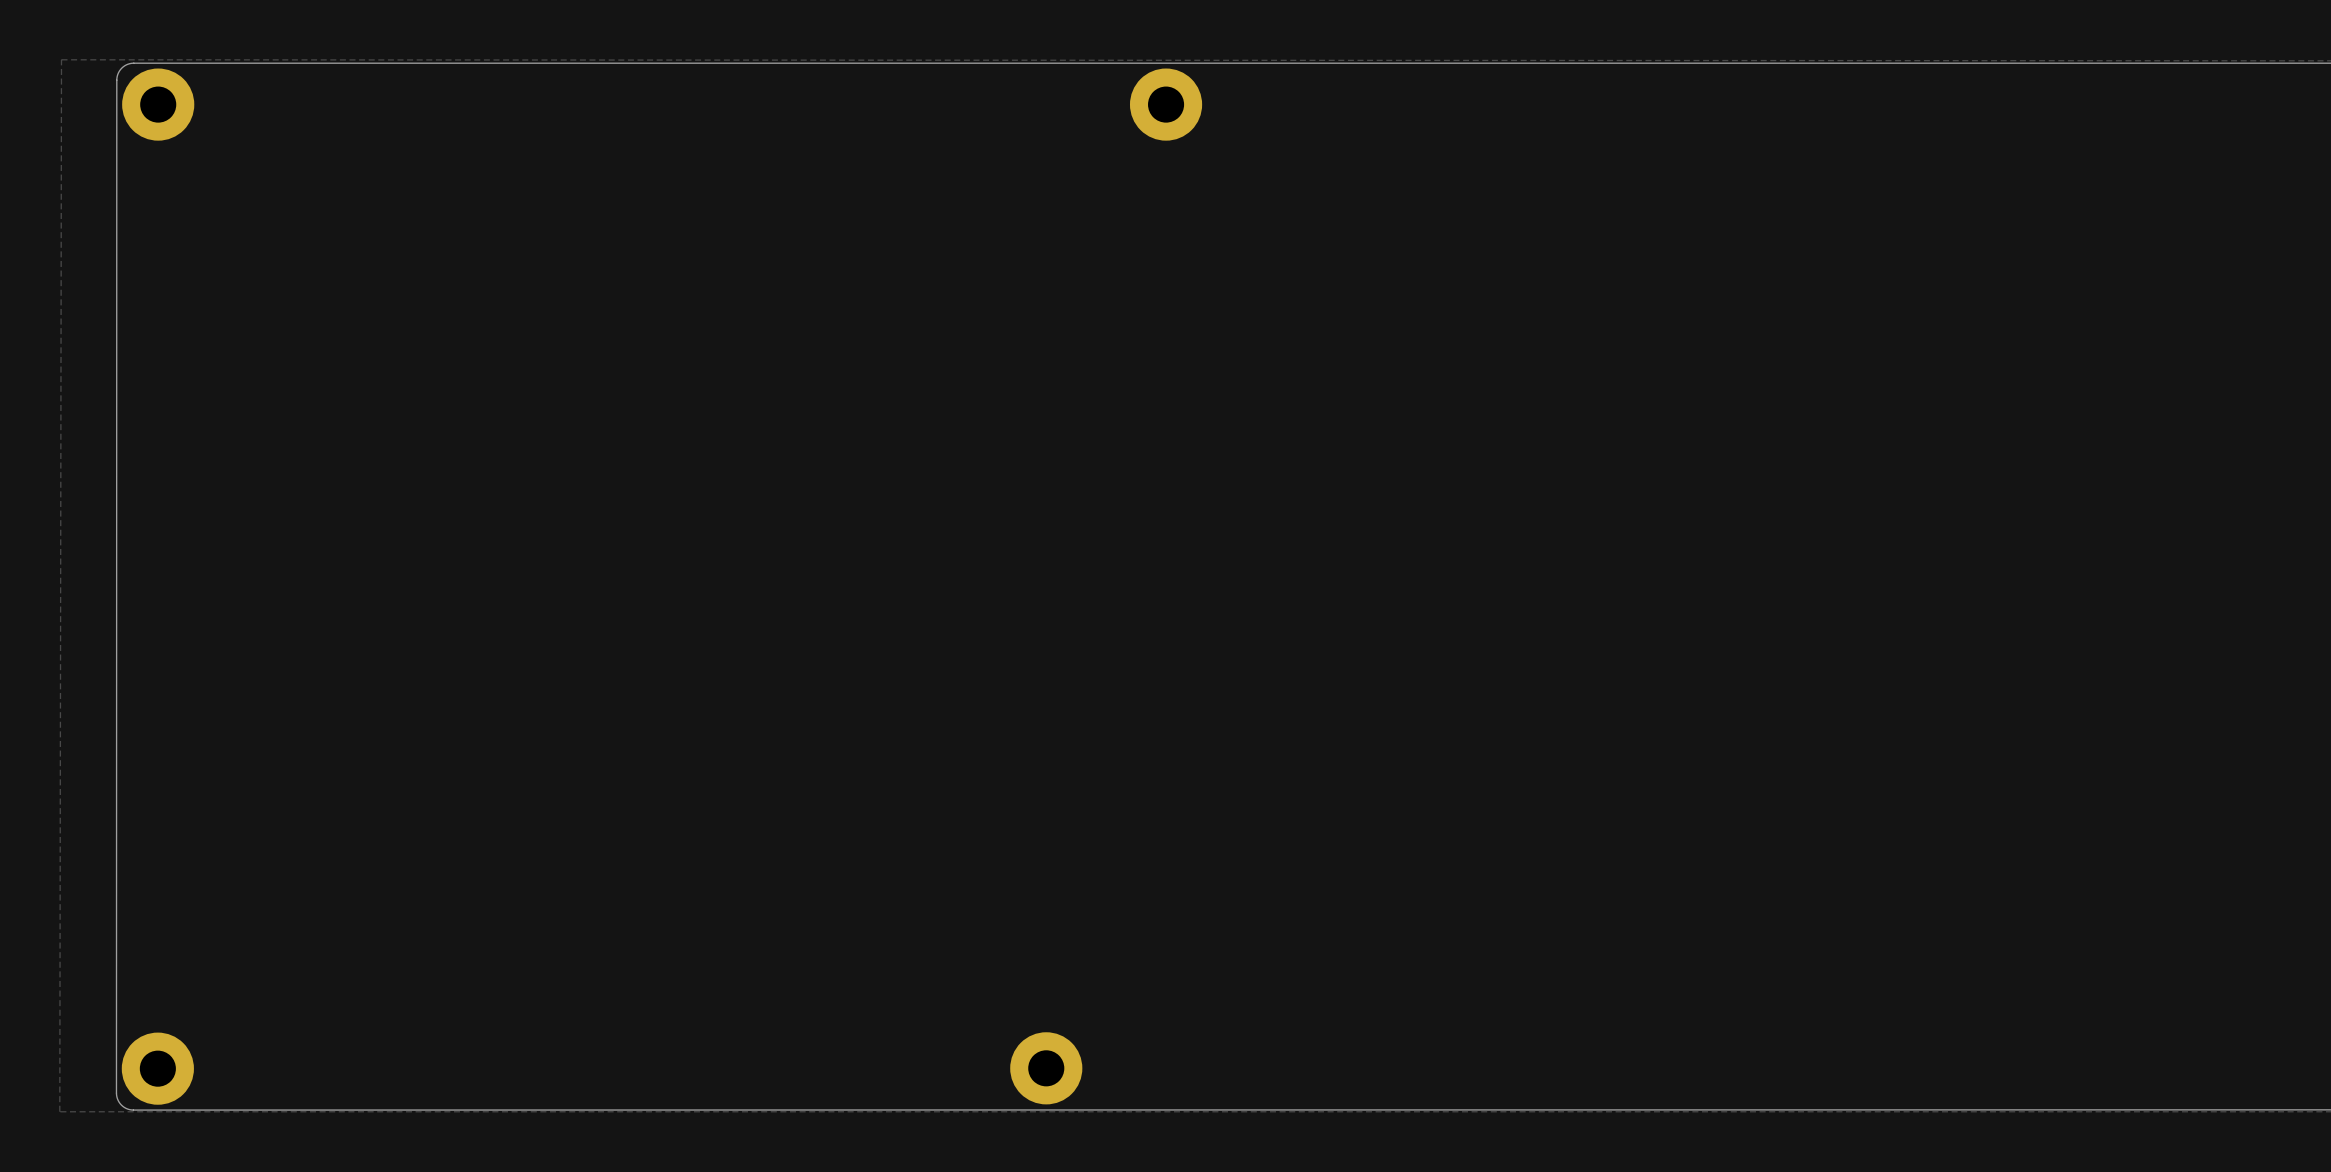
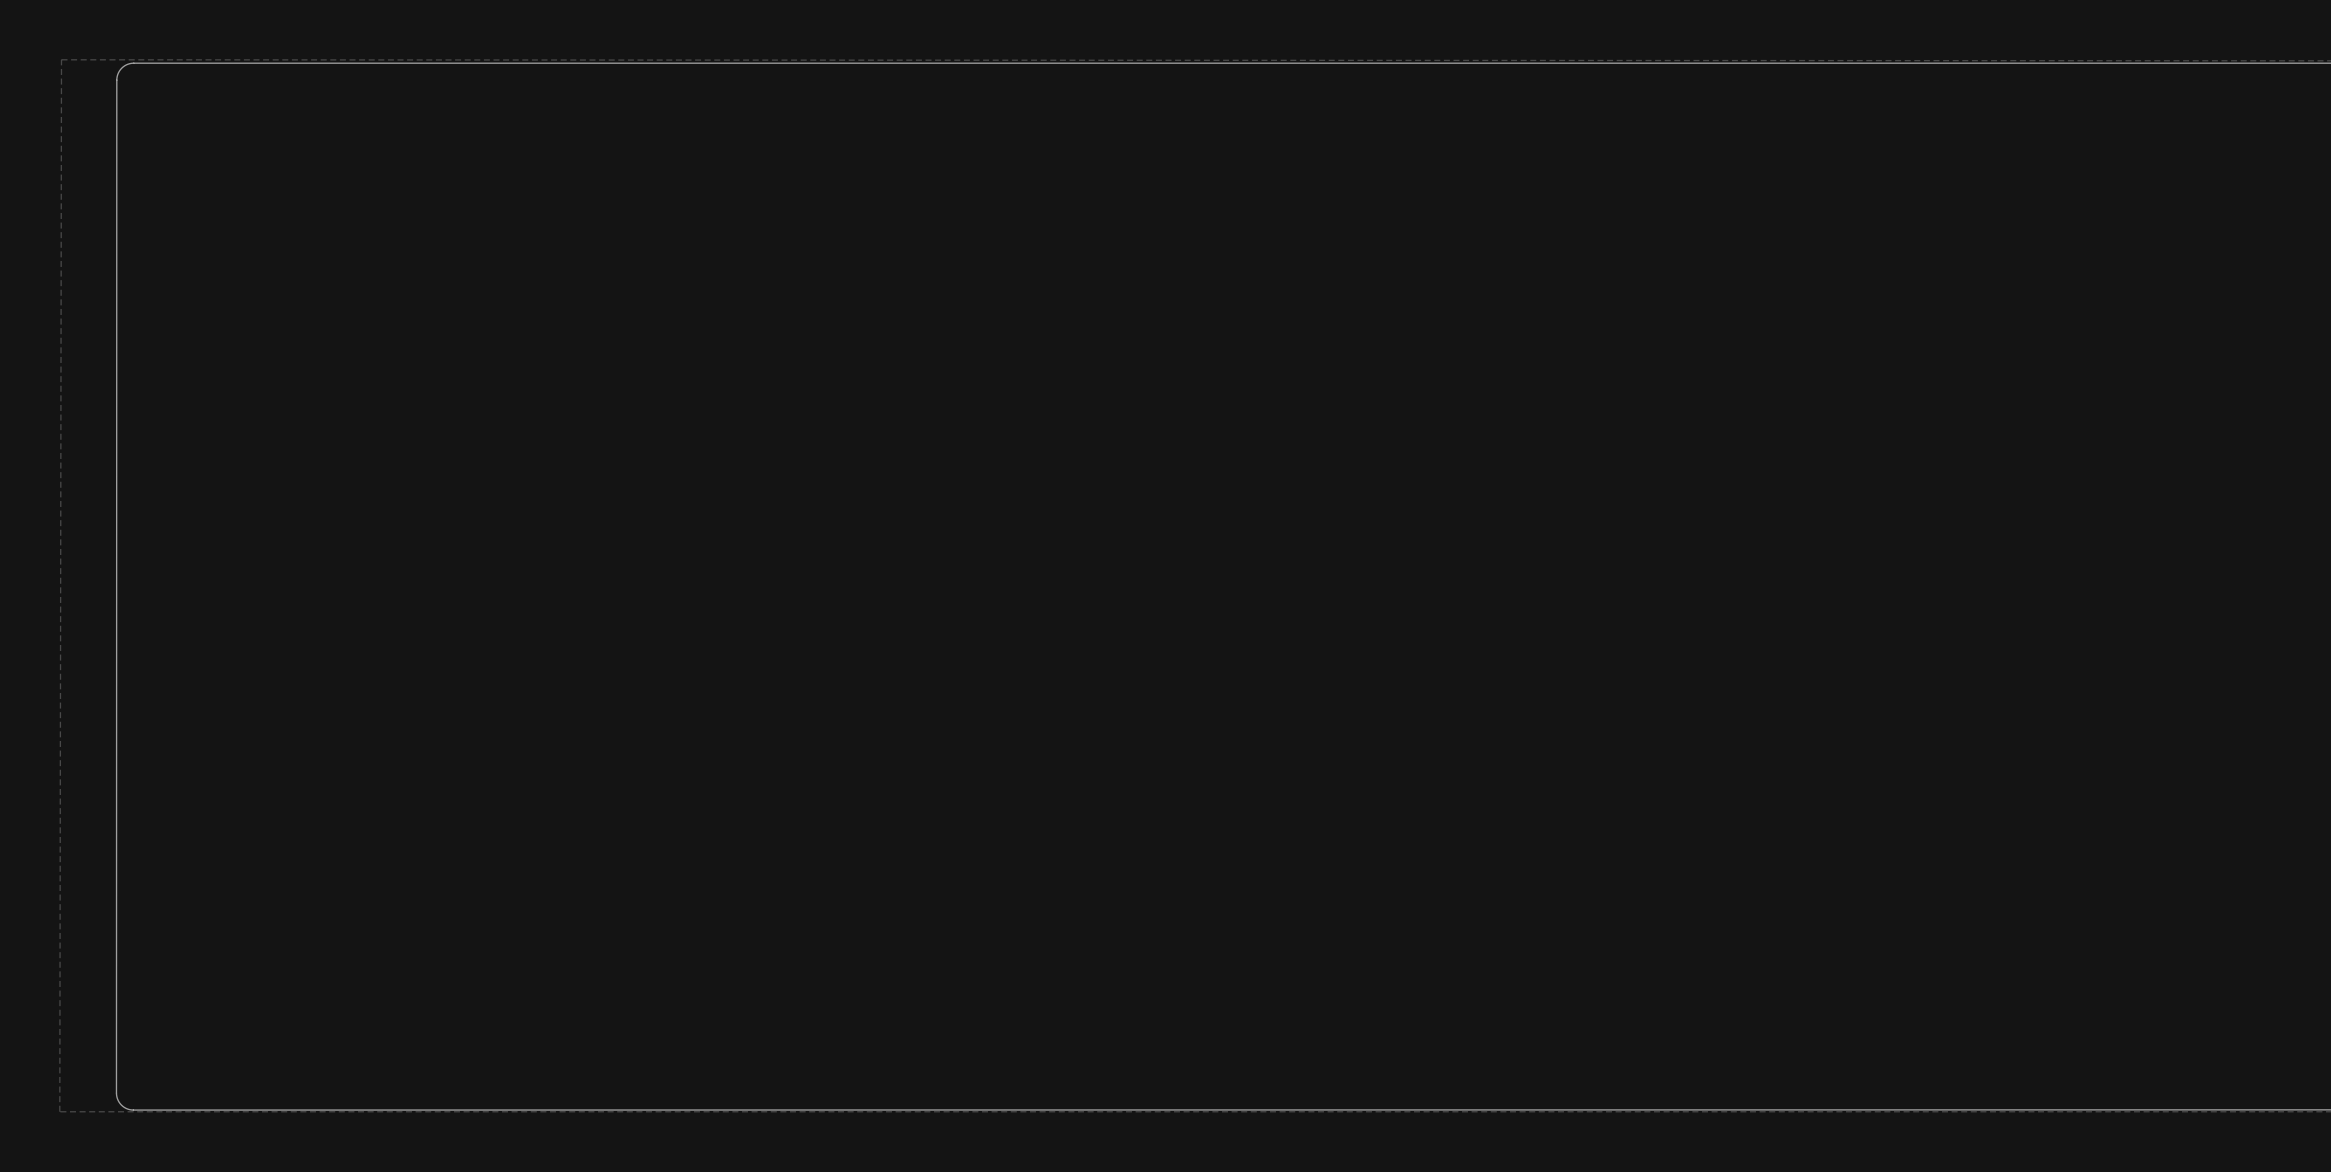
part: (158, 104) -> none
part: (1166, 104) -> none
part: (157, 1068) -> none
part: (1046, 1068) -> none

